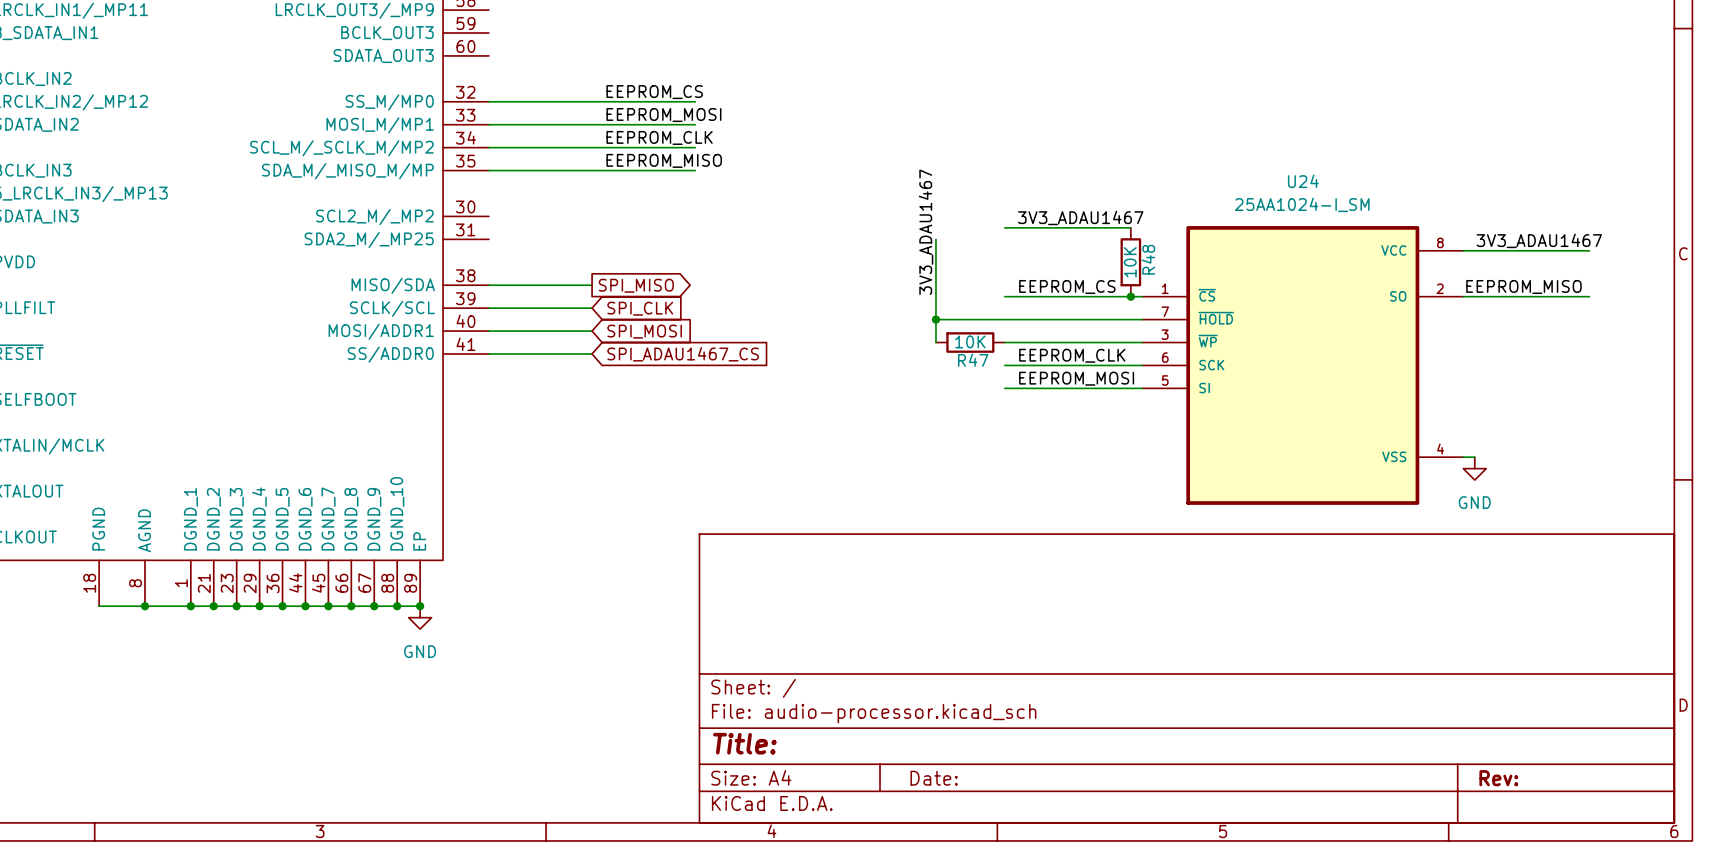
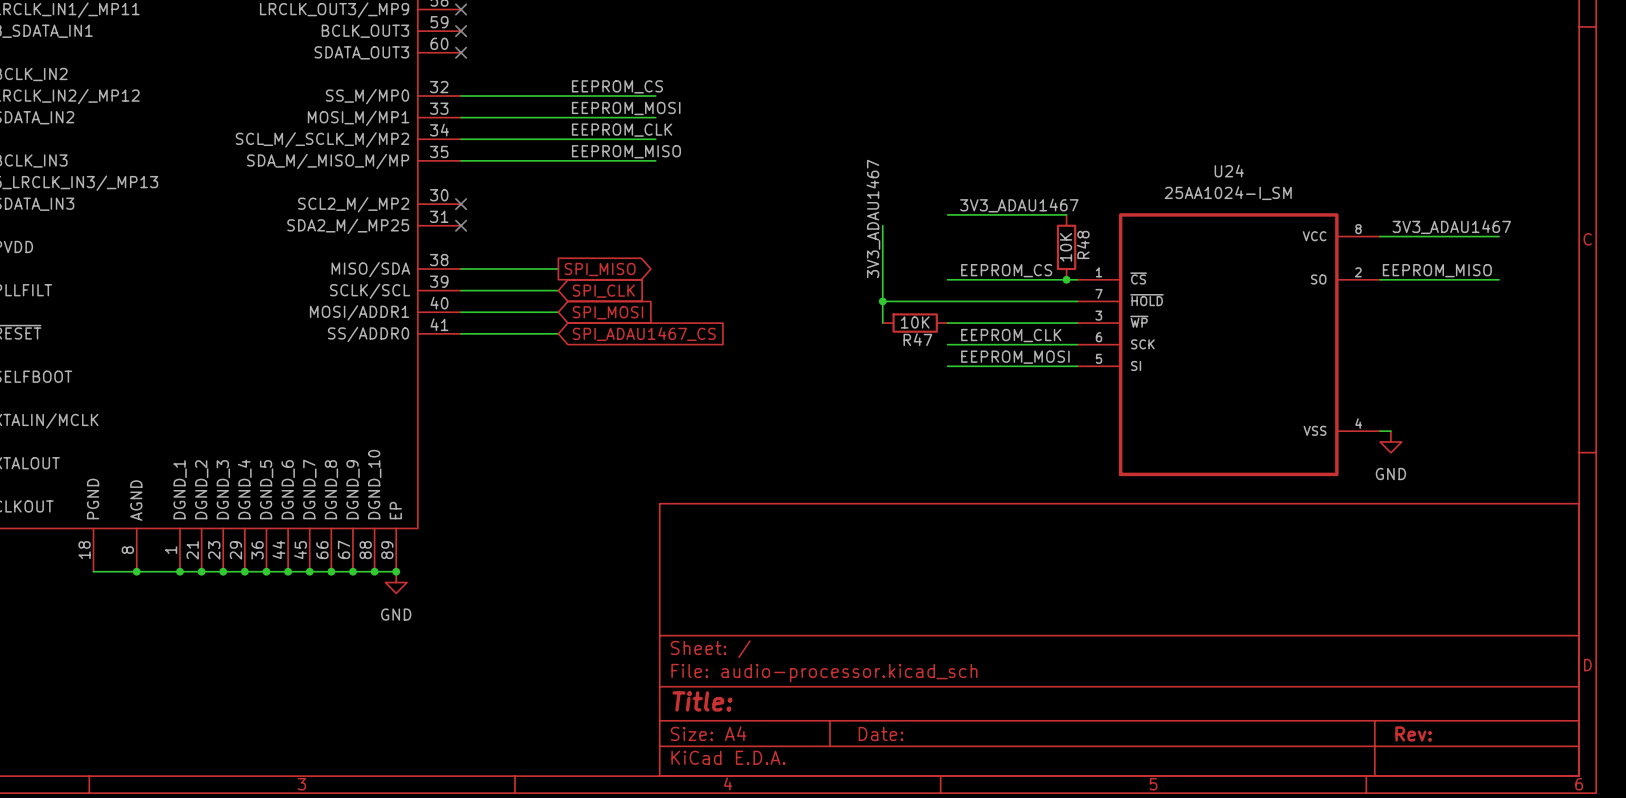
no-connect mark: none -> (461, 9)
no-connect mark: none -> (461, 31)
no-connect mark: none -> (461, 52)
no-connect mark: none -> (461, 204)
no-connect mark: none -> (461, 225)

